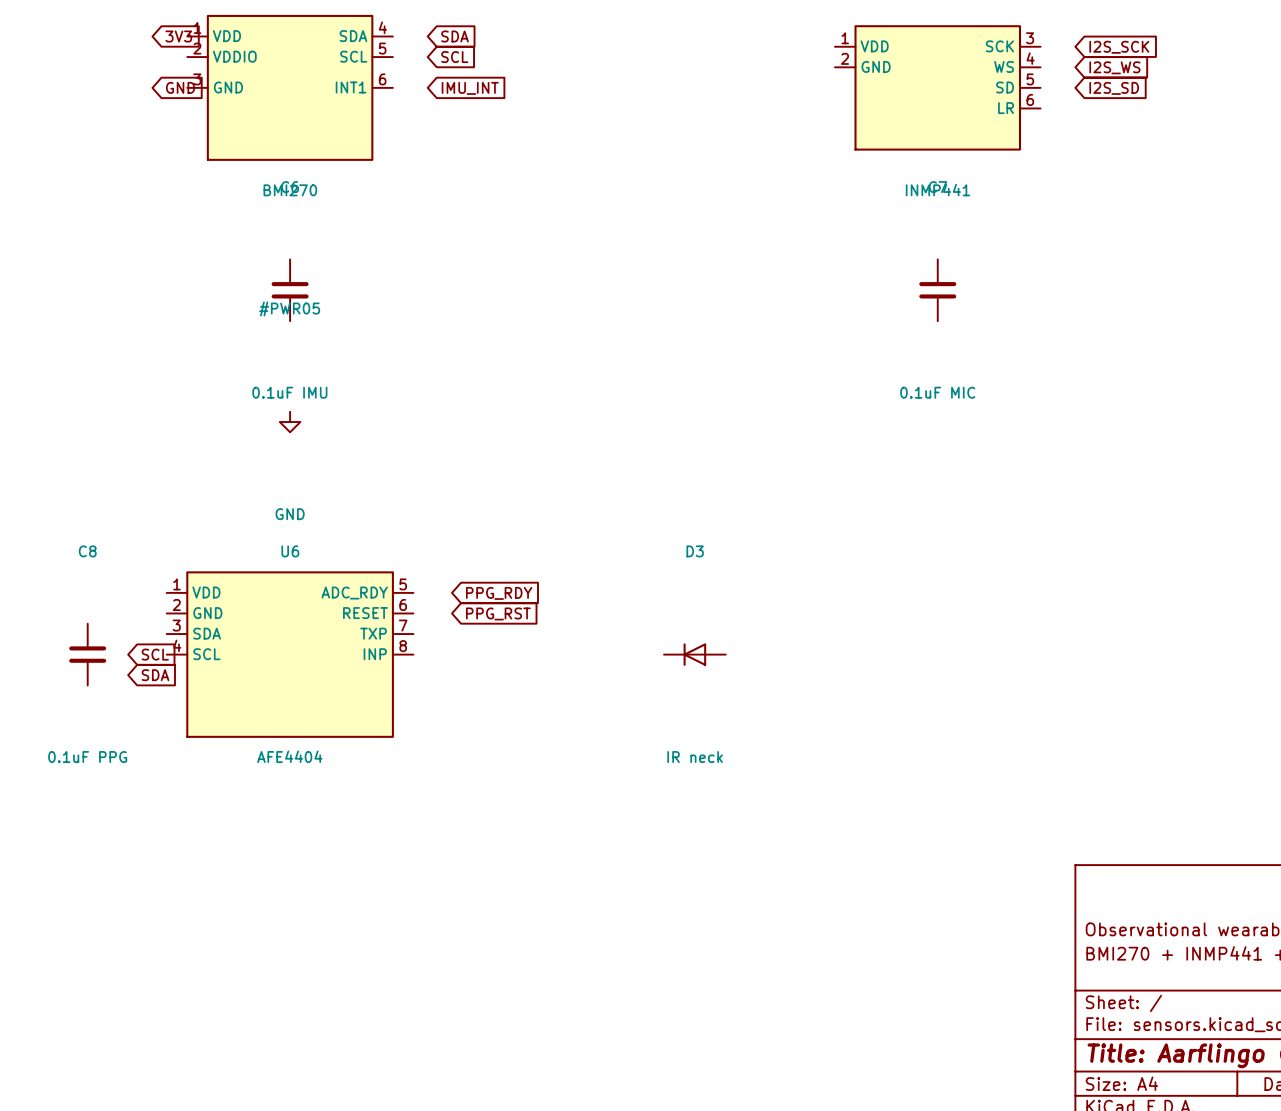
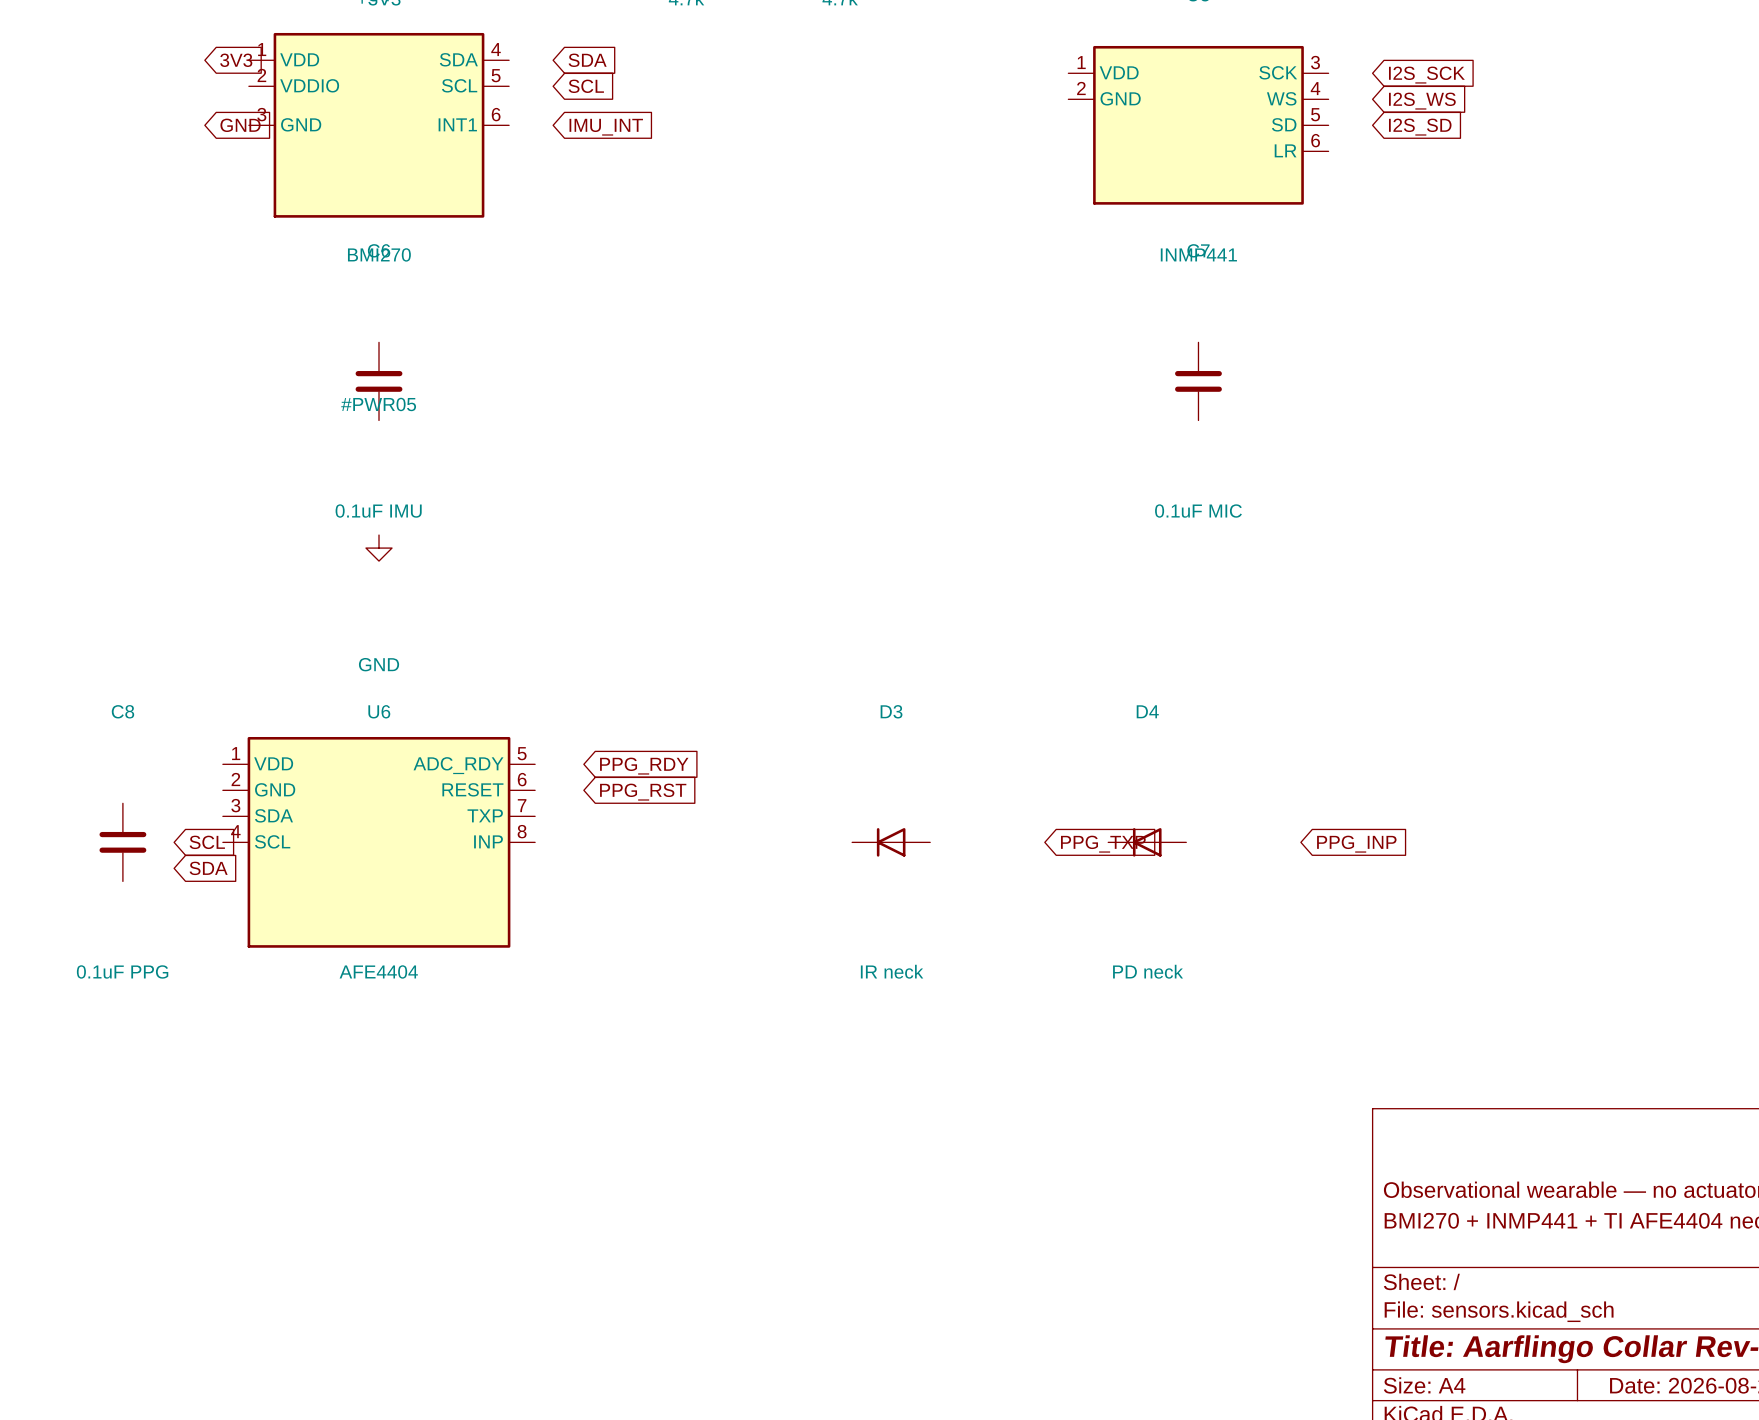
D4: none -> PD neck (1147, 842)
global label: none -> PPG_TXP (1103, 844)
global label: none -> PPG_INP (1356, 844)

